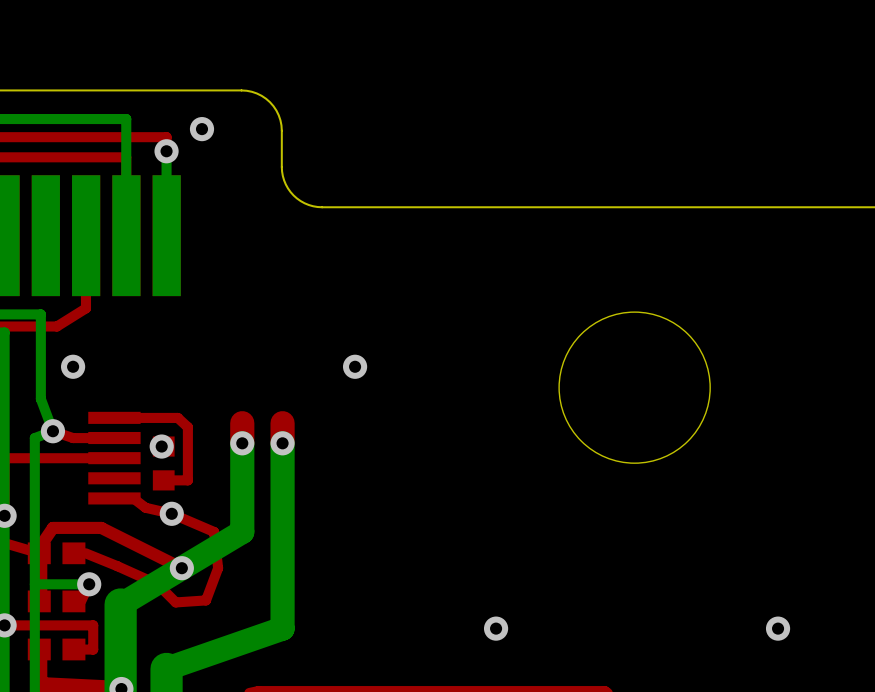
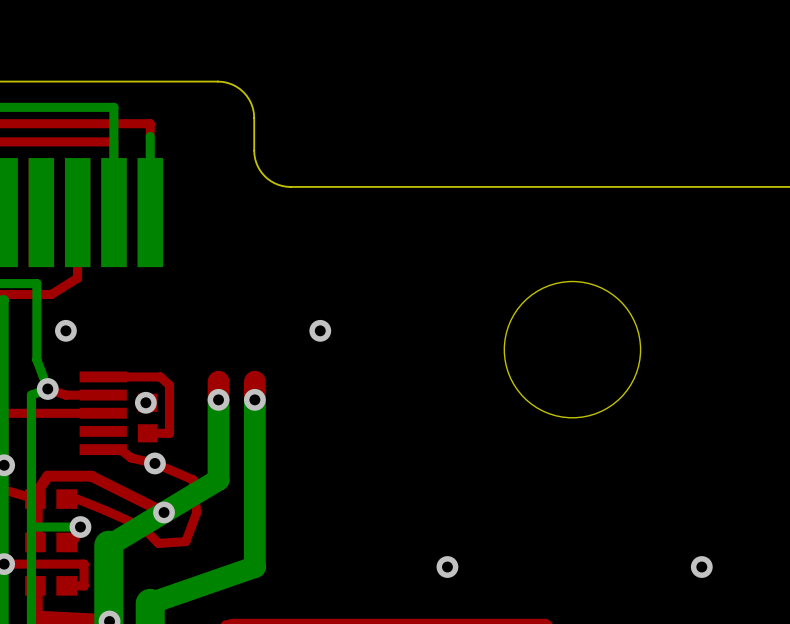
via: (202, 129) -> none
via: (166, 151) -> none

